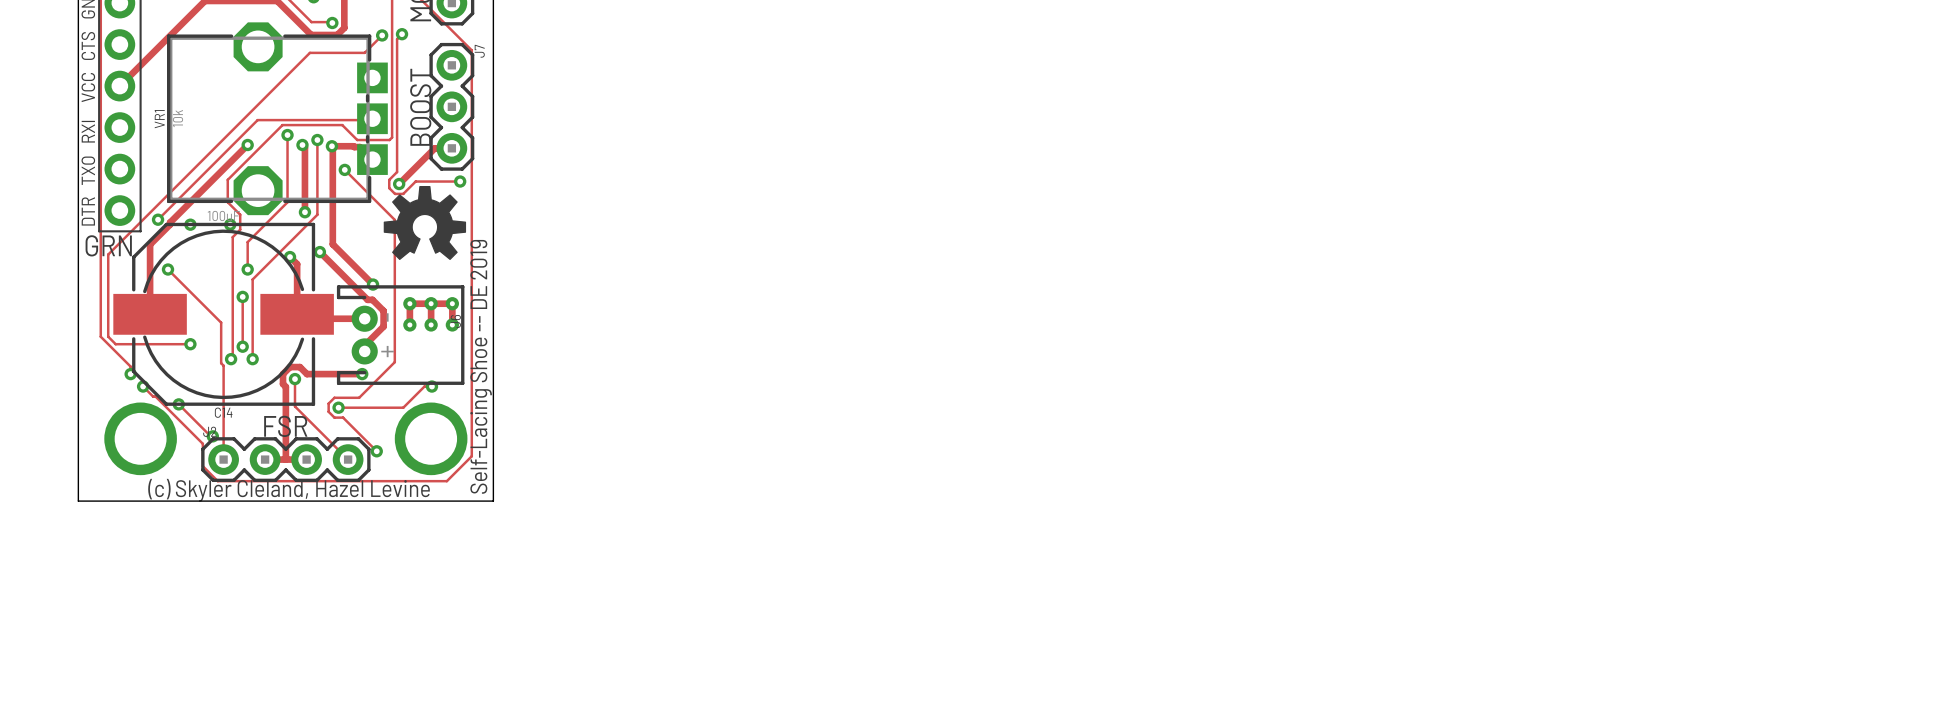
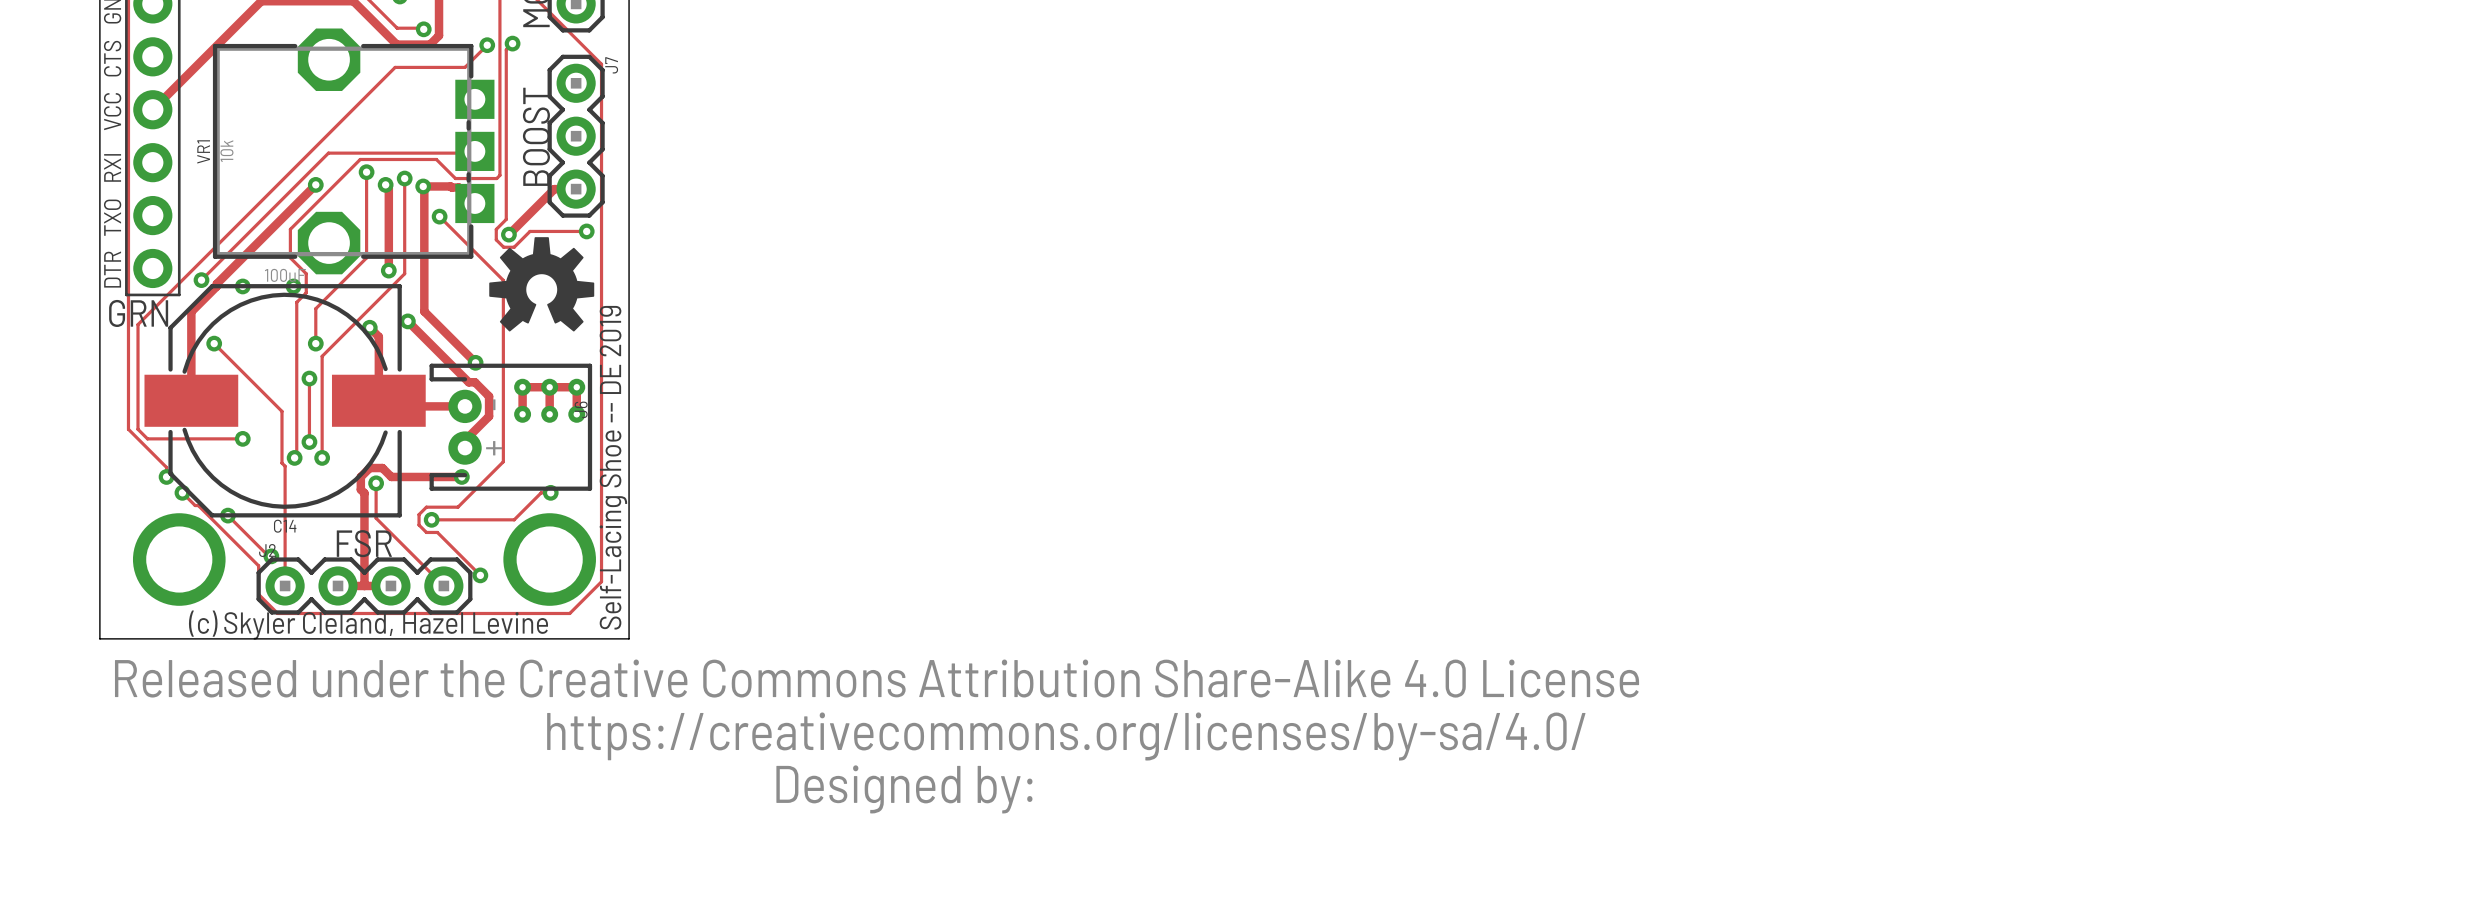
drawing: none -> [114, 659, 1640, 814]

